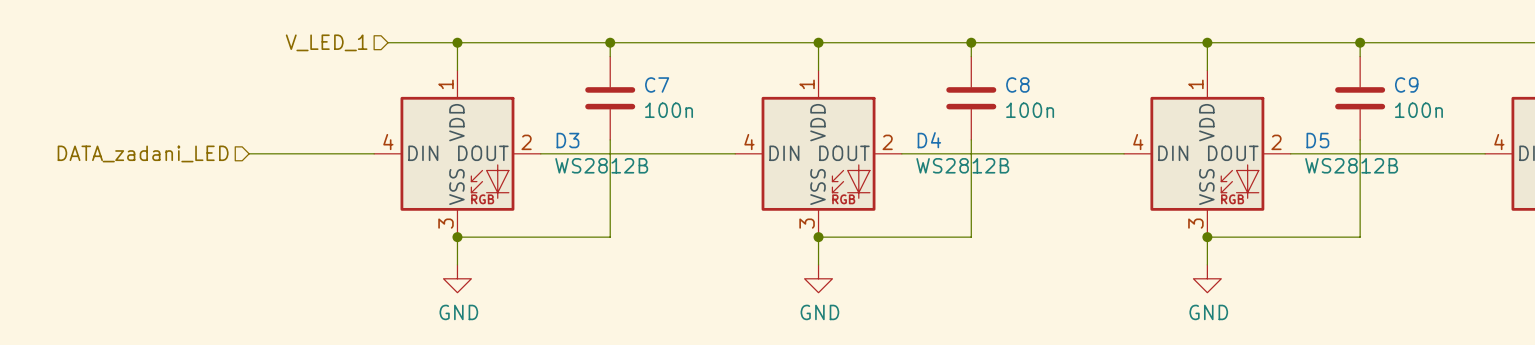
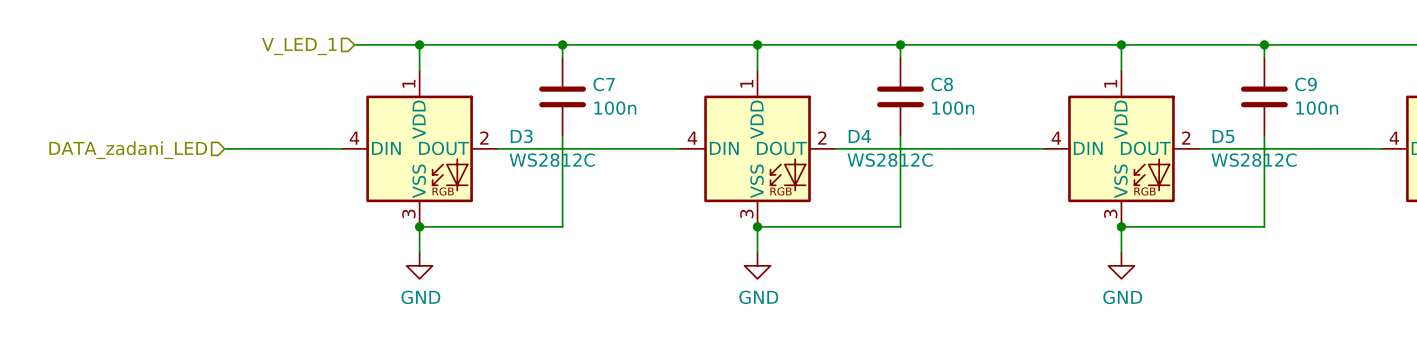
D3 value: WS2812B (601, 165) -> WS2812C (552, 160)
D4 value: WS2812B (962, 165) -> WS2812C (890, 160)
D5 value: WS2812B (1351, 165) -> WS2812C (1254, 160)

